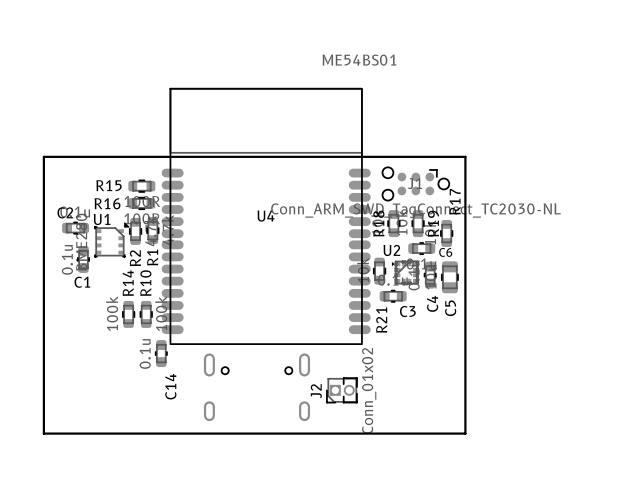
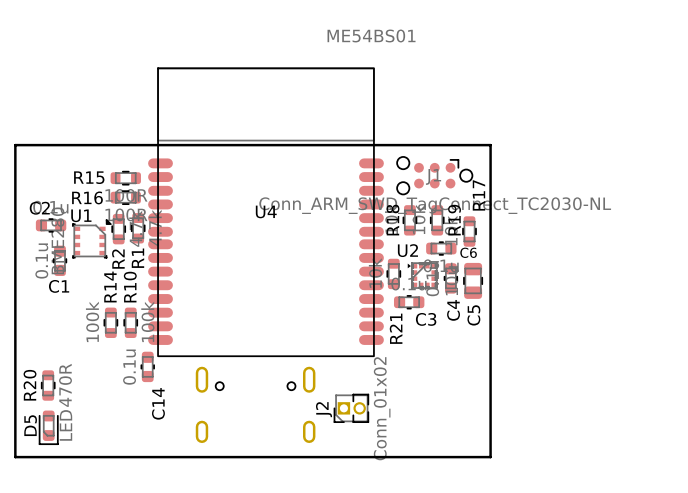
R20: none -> 470R (48, 385)
D5: none -> LED (48, 427)

